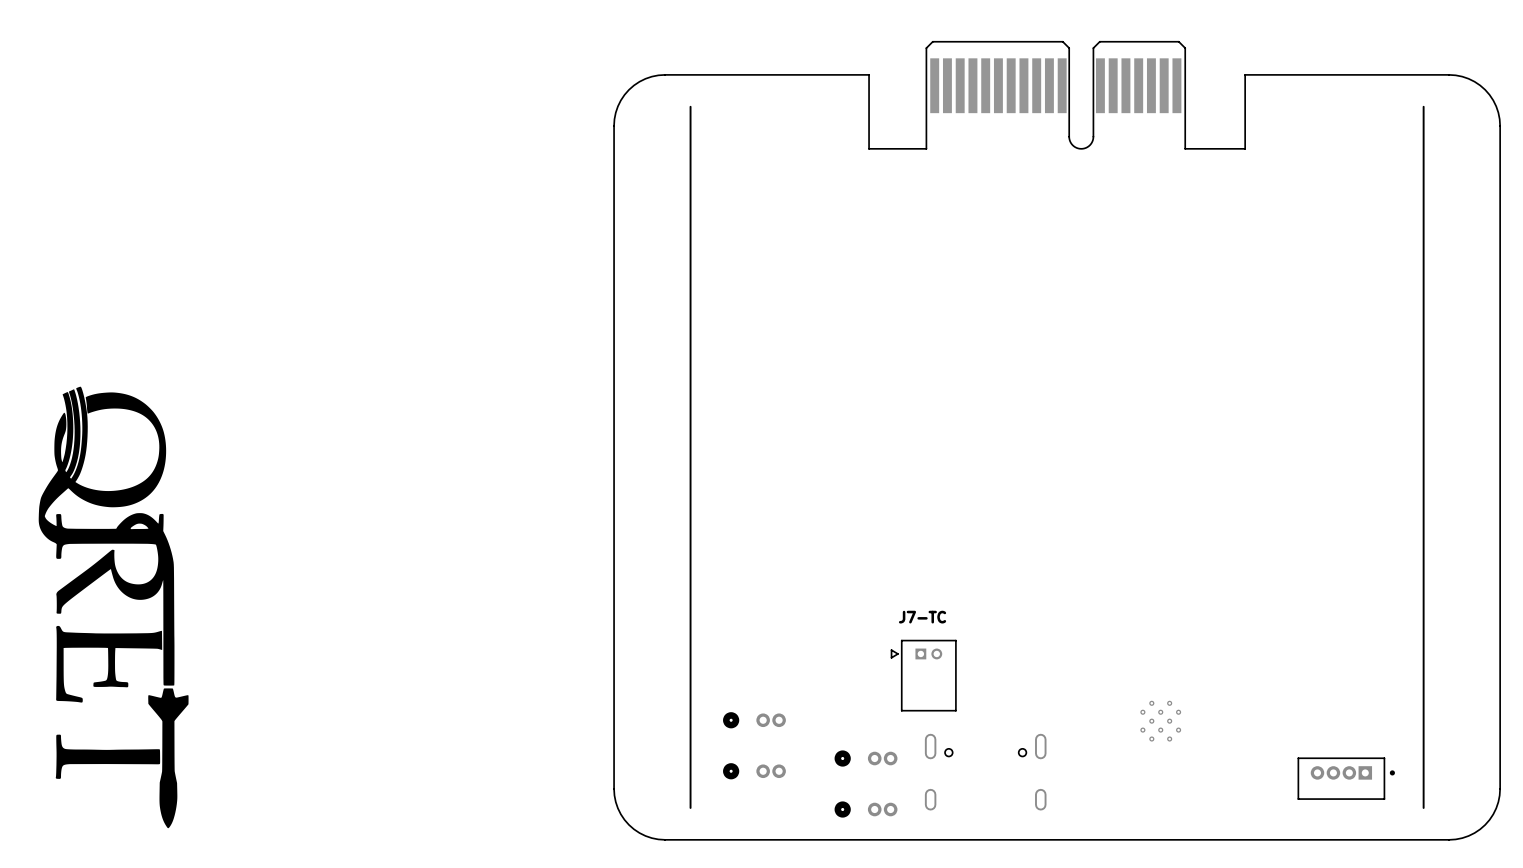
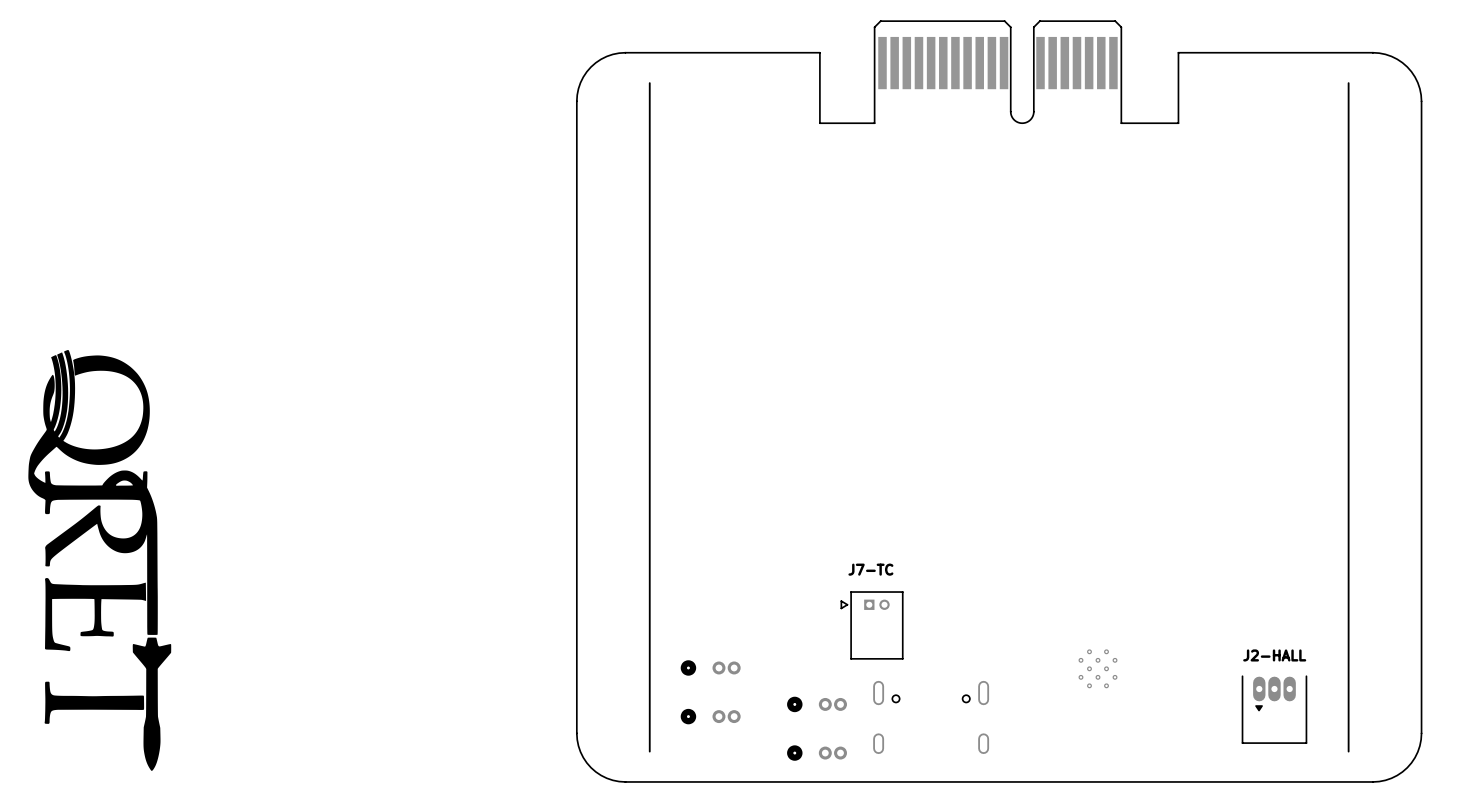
J2-HALL: none -> (1274, 709)
part: (1346, 778) -> none

